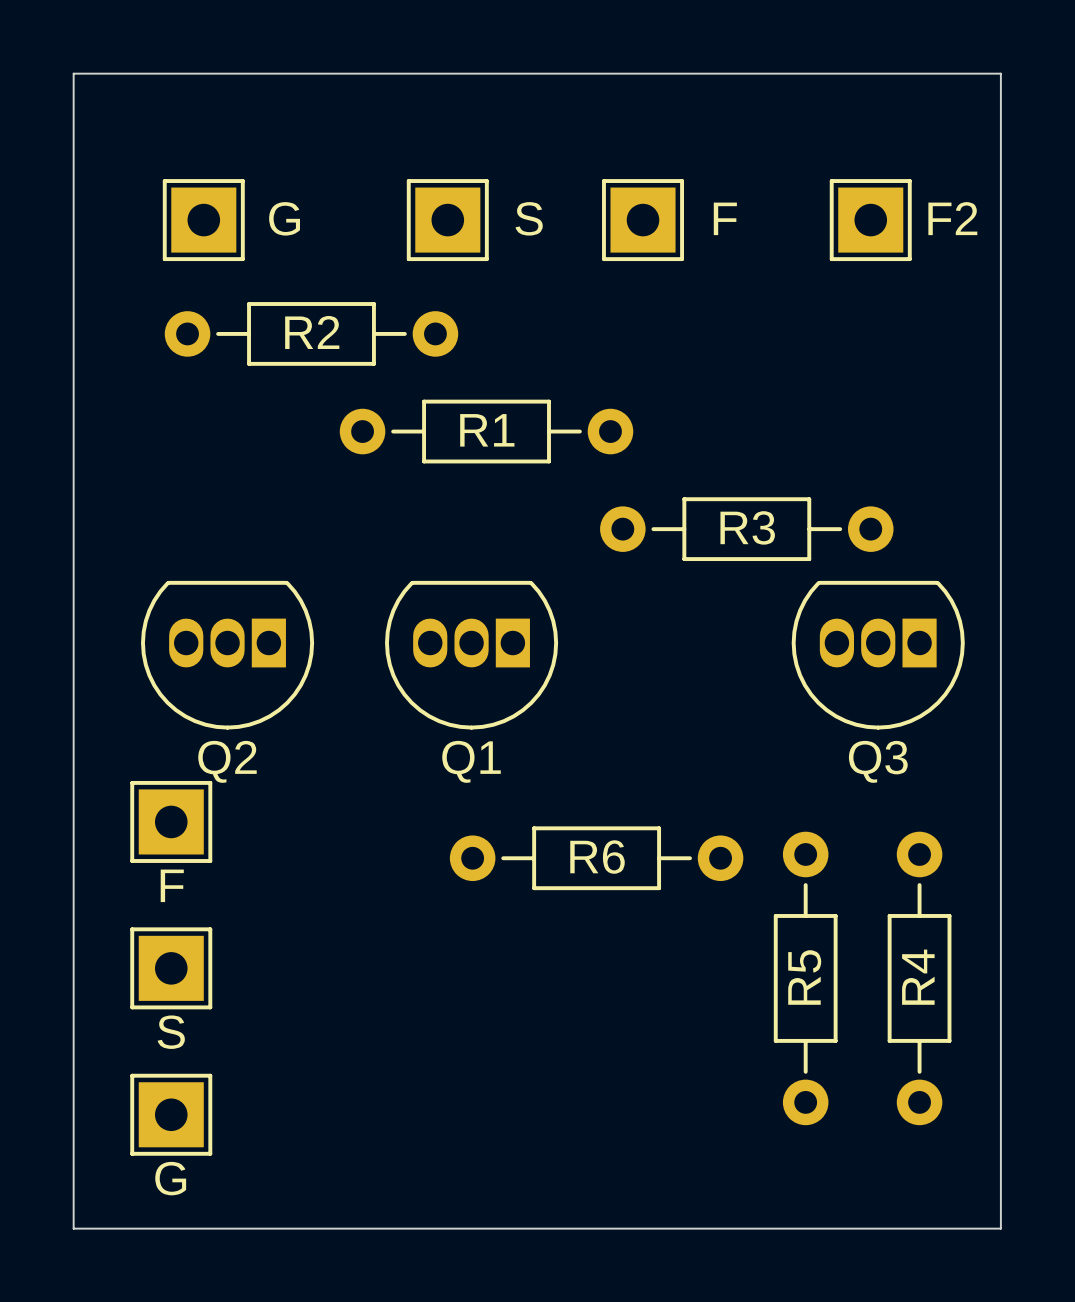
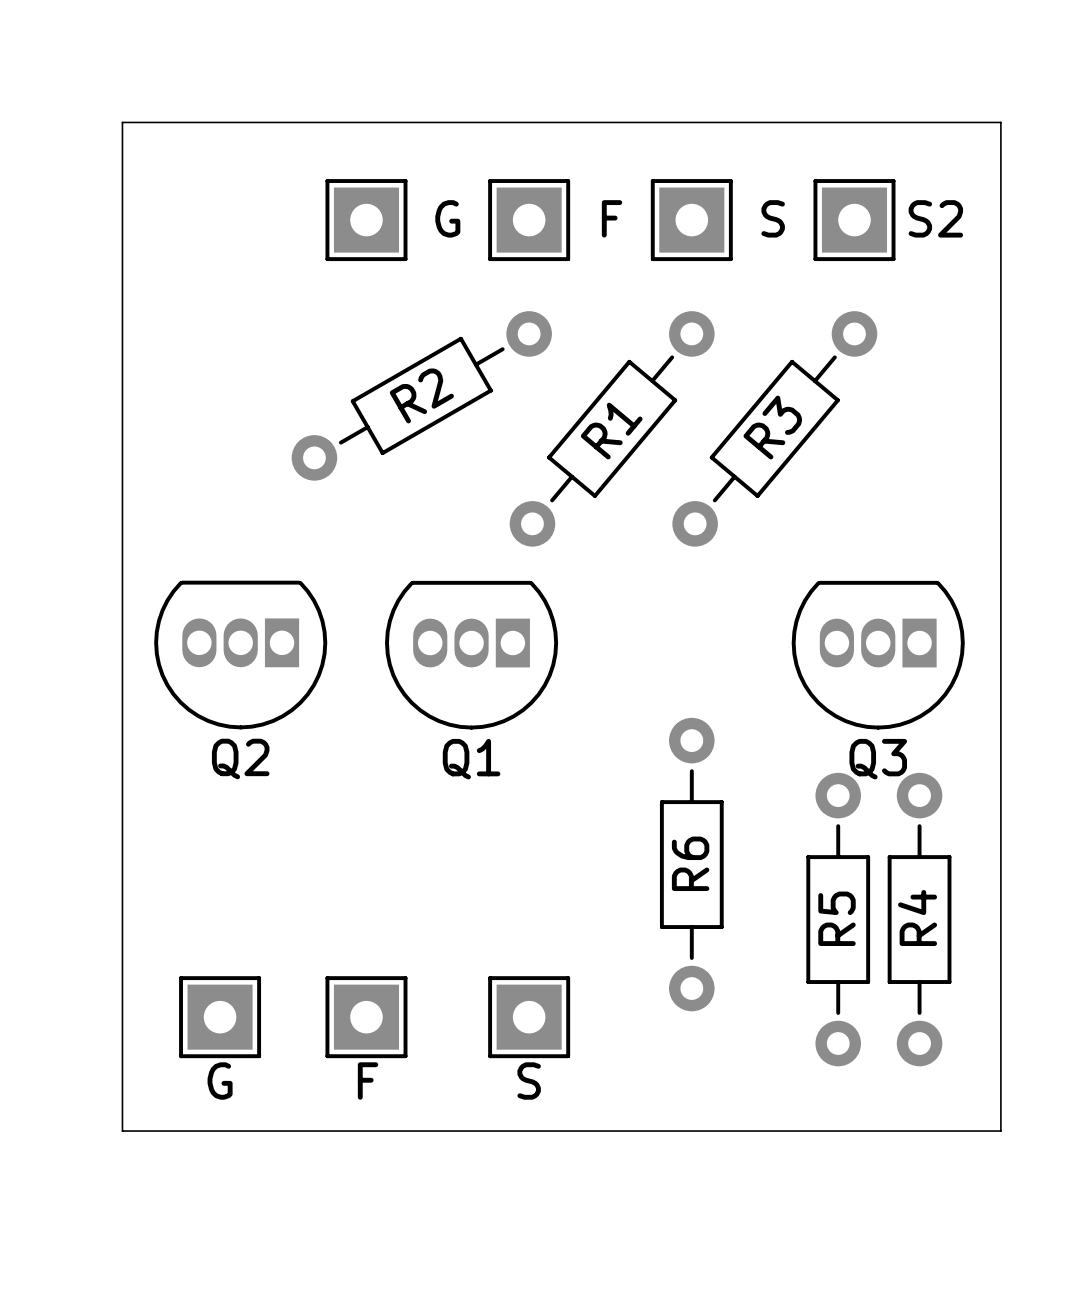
board edge: (1000, 122) (1000, 73) (73, 73) (73, 1228) (1000, 1228) (1000, 1131) -> (1000, 122) (122, 122) (122, 1131) (1000, 1131)
part value: F2 (952, 218) -> S2 (935, 218)
part position: (203, 220) -> (366, 220)
part position: (447, 220) -> (691, 220)
part position: (643, 220) -> (529, 220)
part position: (870, 220) -> (854, 220)
R2 rotation: 0° (311, 333) -> 30° counterclockwise (421, 395)
R1 rotation: 0° (486, 431) -> 50° counterclockwise (612, 428)
R3 rotation: 0° (746, 529) -> 50° counterclockwise (774, 428)
Q2 position: (227, 655) -> (240, 655)
part position: (171, 821) -> (366, 1017)
R6 rotation: 0° (596, 858) -> 90° clockwise (691, 864)
part position: (171, 968) -> (529, 1017)
R5 position: (805, 978) -> (838, 919)
R4 position: (919, 978) -> (919, 919)
part position: (171, 1114) -> (220, 1017)

